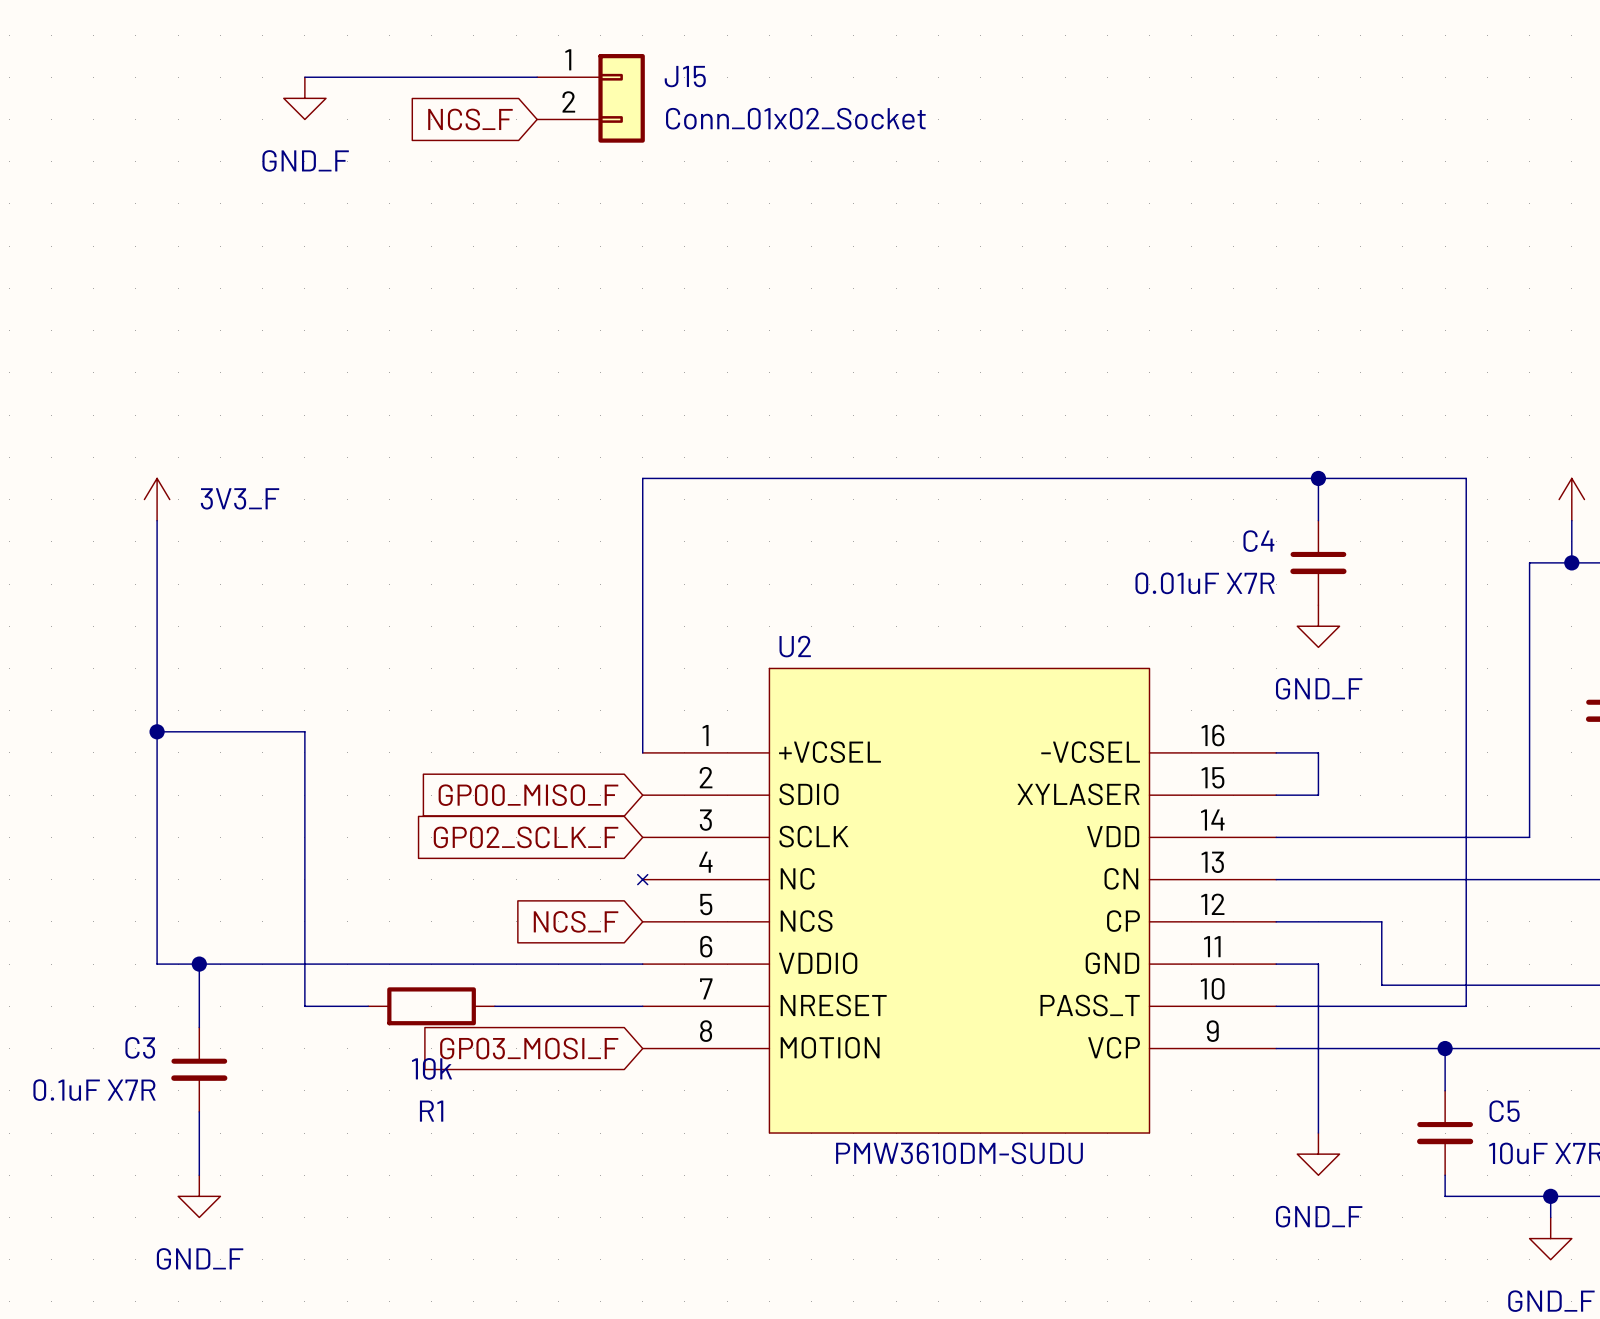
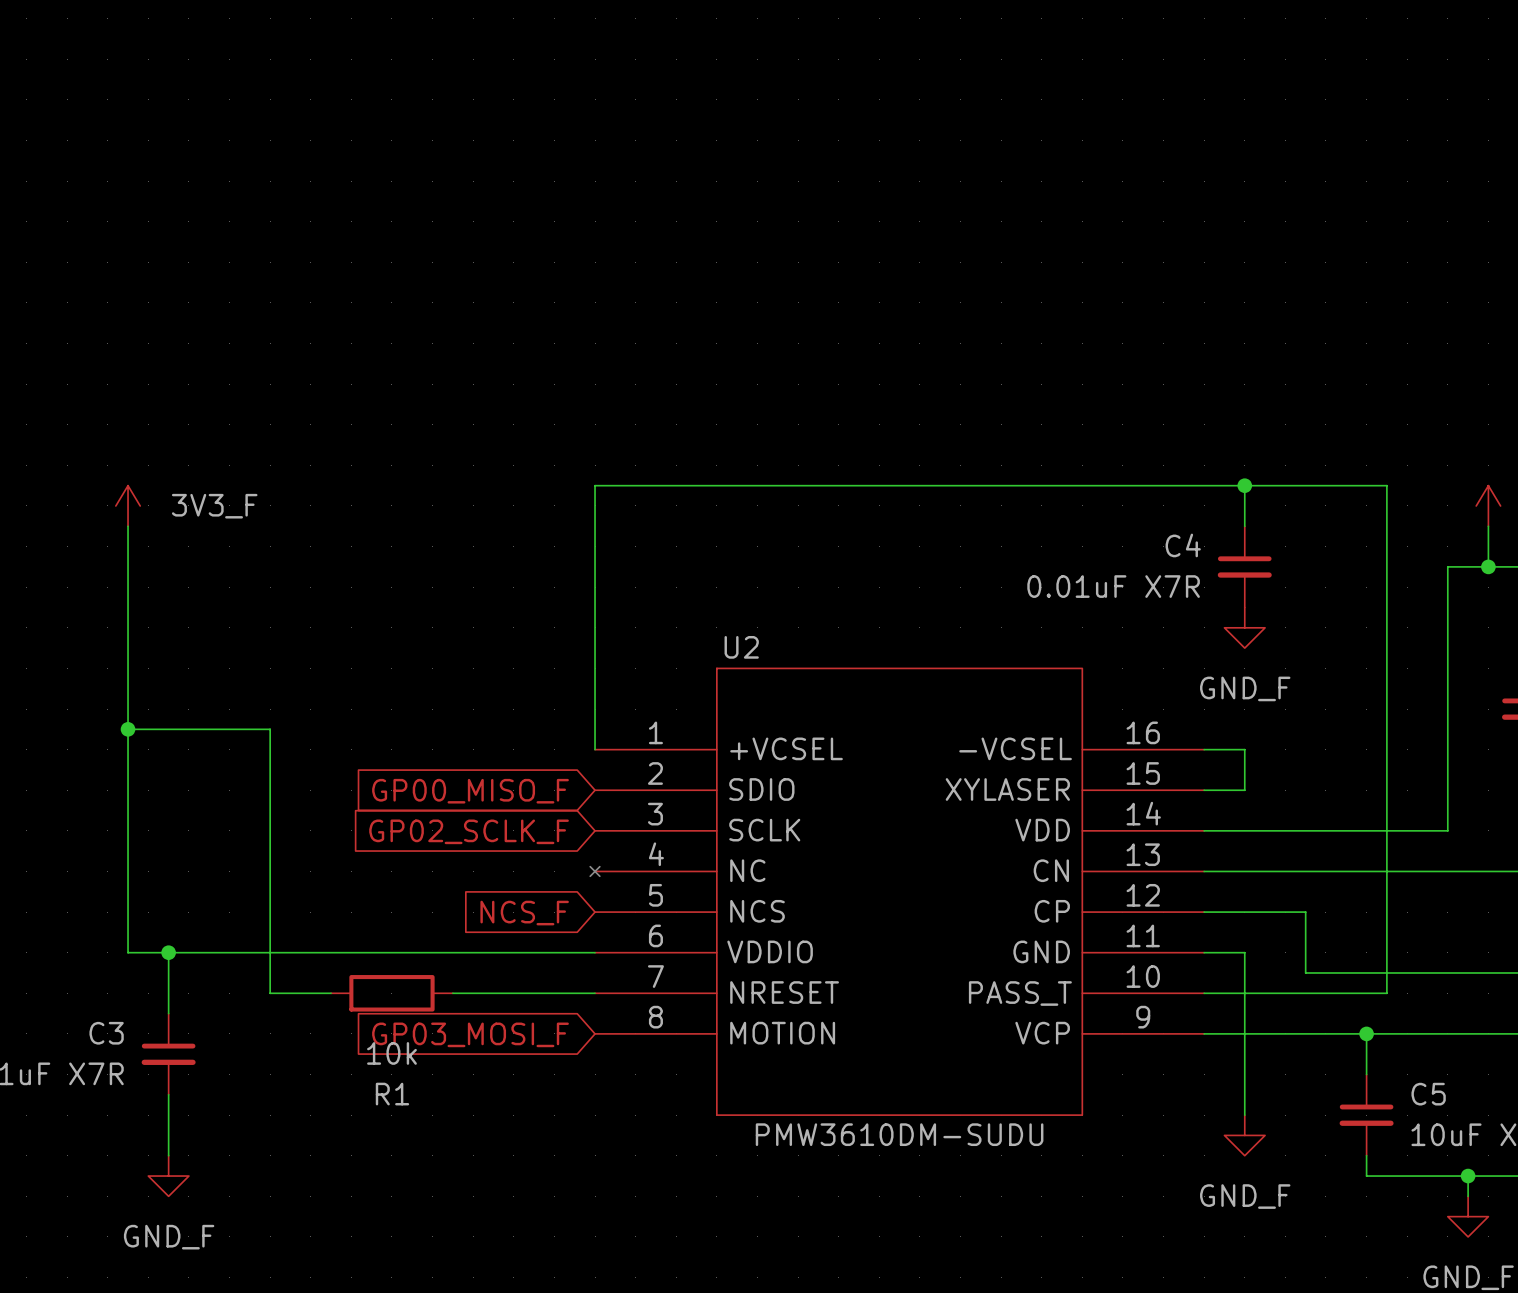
wire: (304, 77) (537, 77) -> none
power symbol: GND_F (304, 98) -> none
J15: Conn_01x02_Socket (591, 98) -> none
global label: NCS_F (470, 119) -> none

